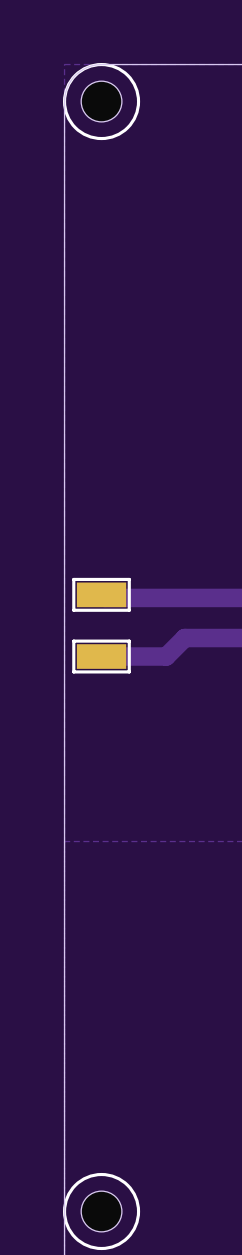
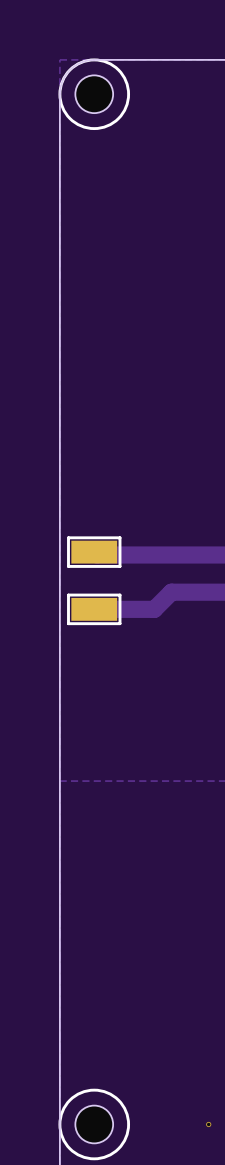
via: none -> (208, 1124)

